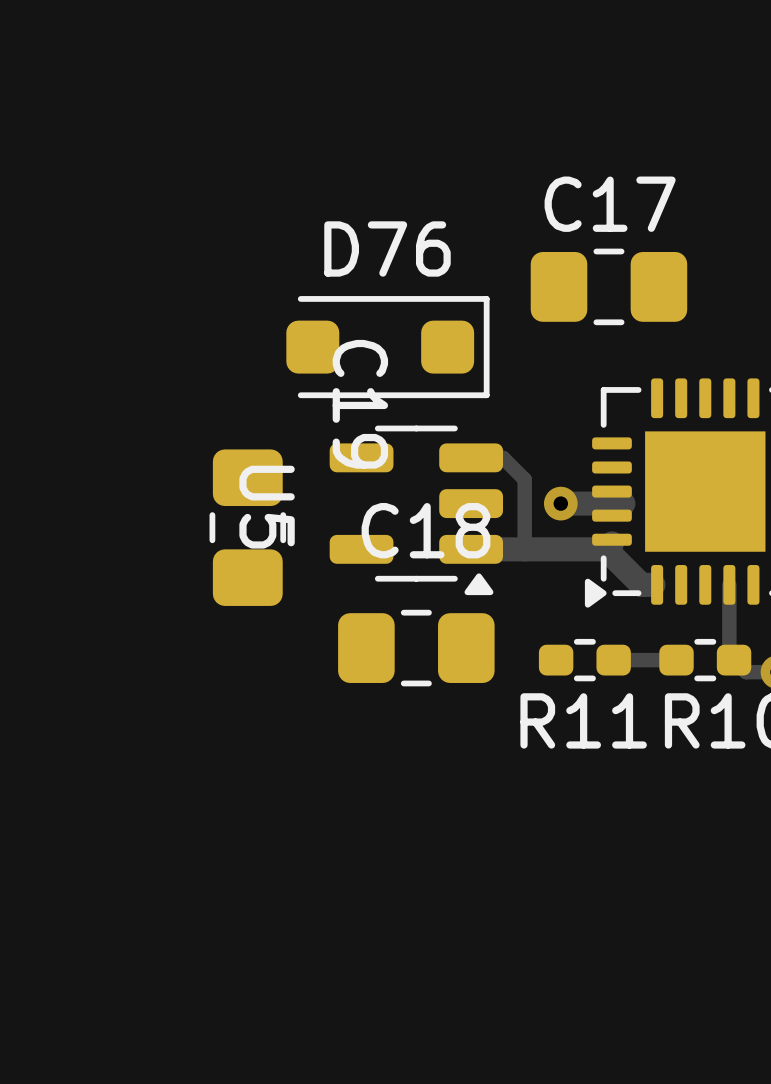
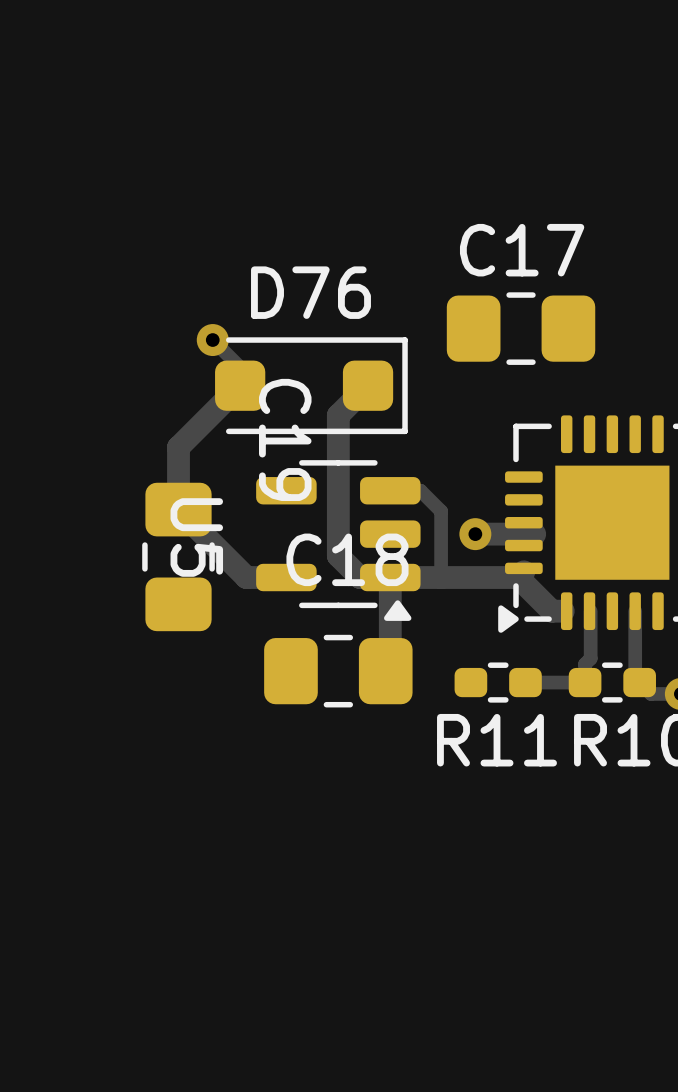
track: none -> (212, 340) (240, 367) (240, 385) (178, 447) (178, 509) (246, 577) (286, 577)
via: none -> (212, 340)
track: none -> (368, 385) (338, 415) (338, 555) (360, 577) (390, 577) (390, 666) (385, 671)
track: none -> (590, 611) (590, 658) (585, 664) (585, 682)

